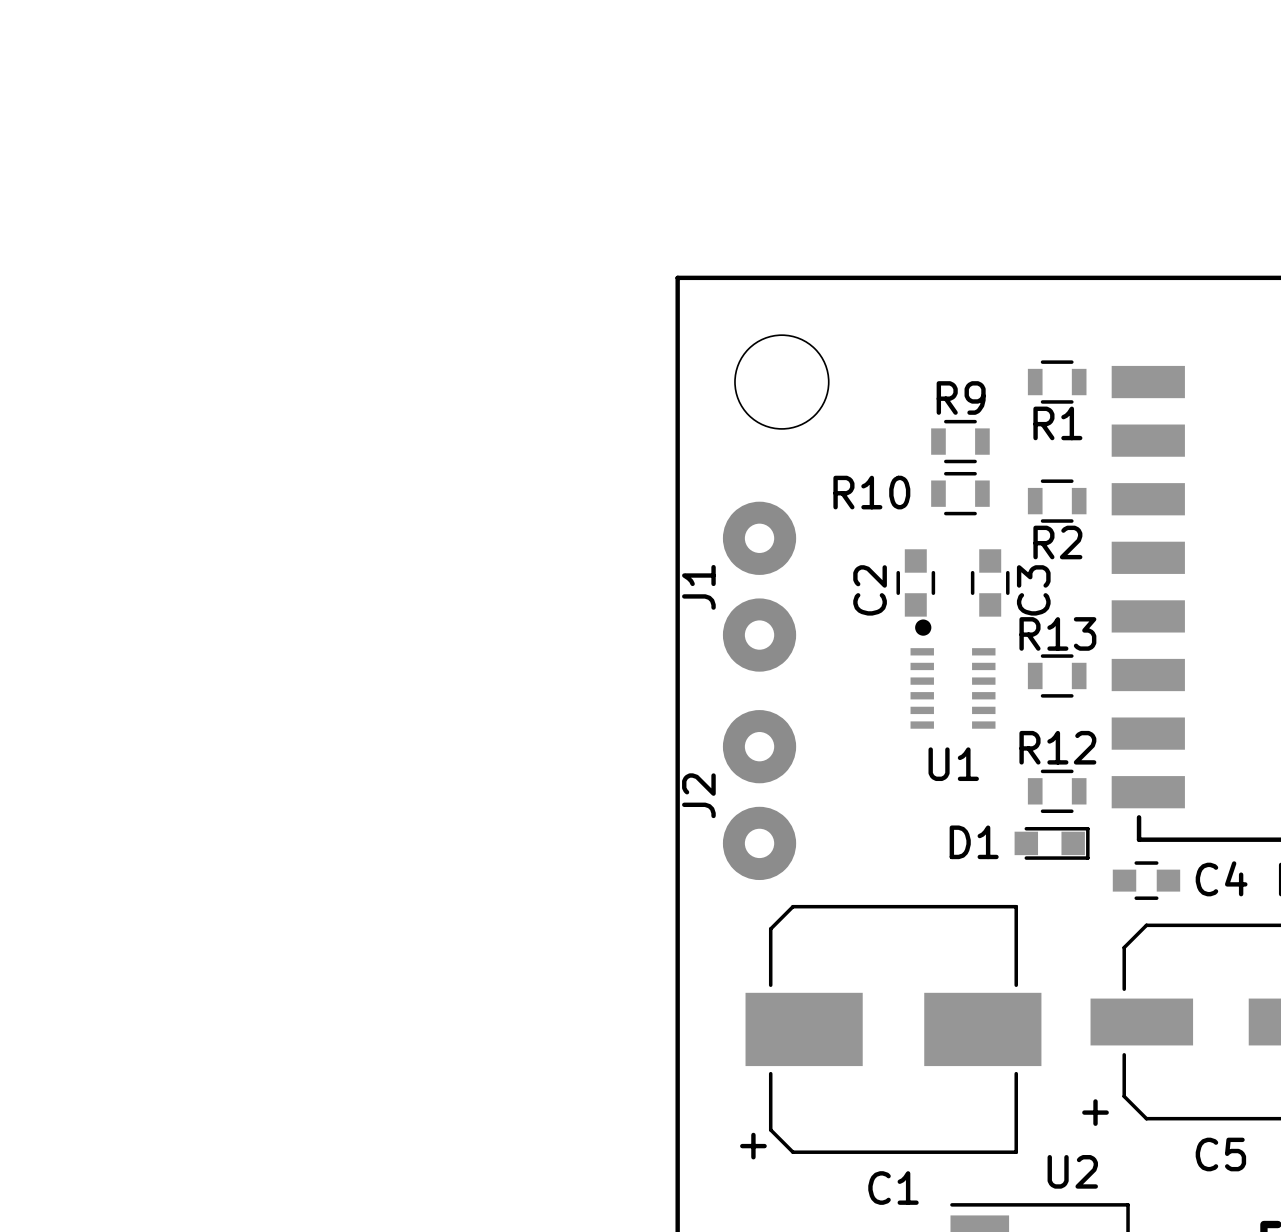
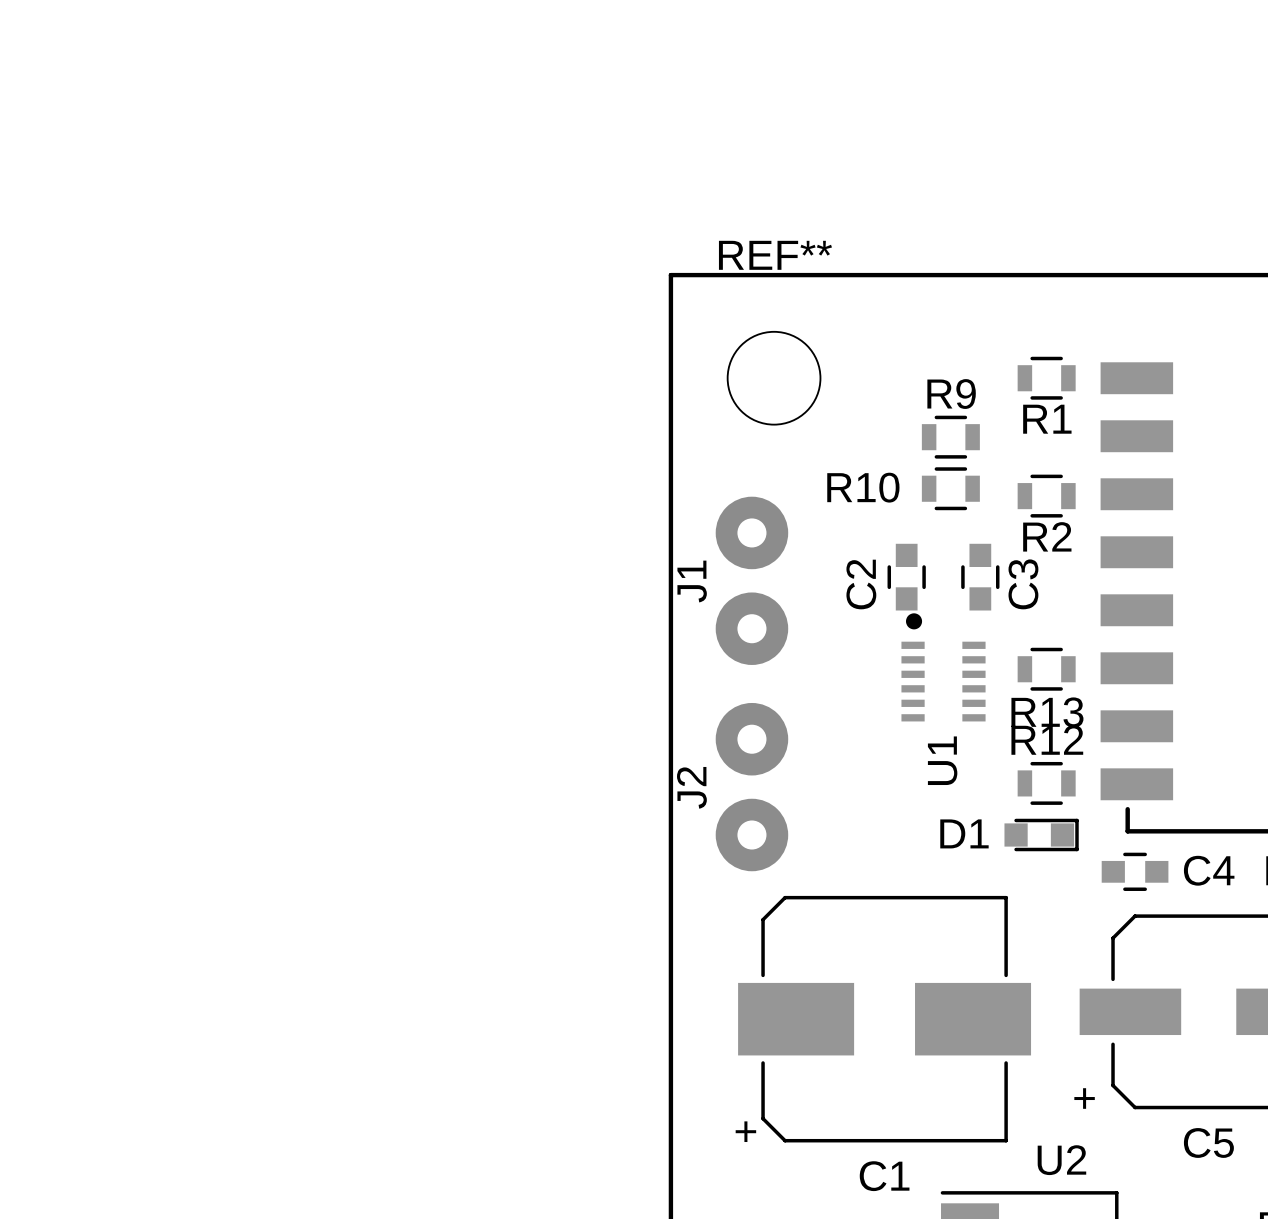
REF** name: none -> REF** (775, 255)
R13 name position: R13 (1057, 633) -> R13 (1047, 712)
U1 name rotation: 0° (953, 764) -> 90° counterclockwise (942, 760)

